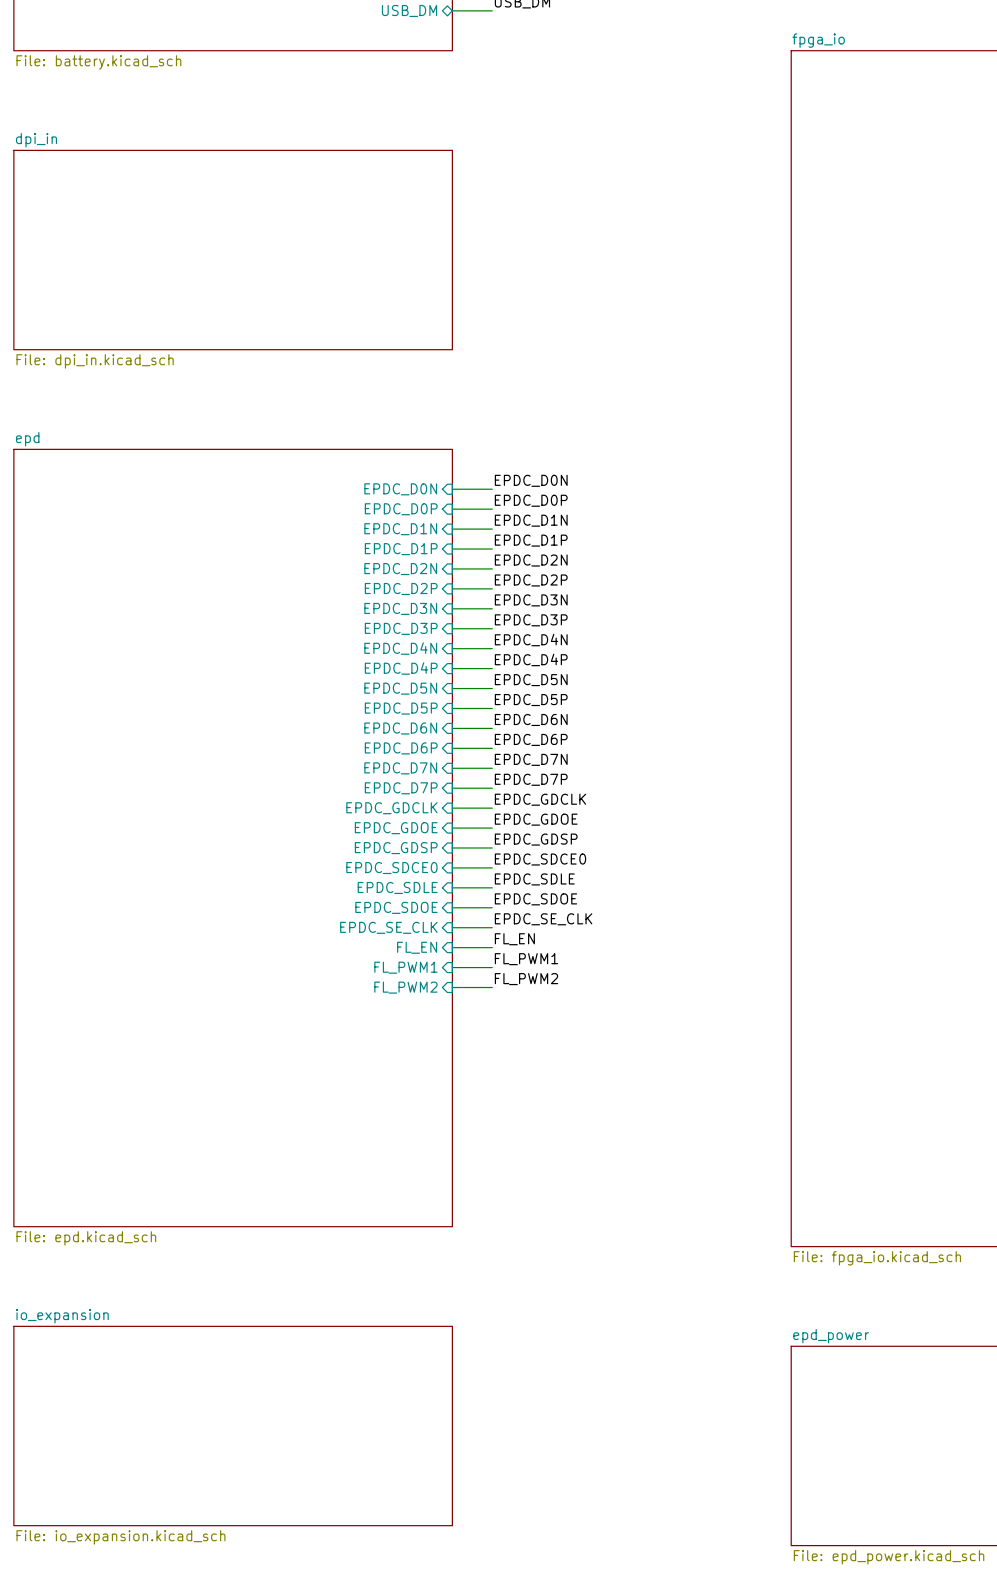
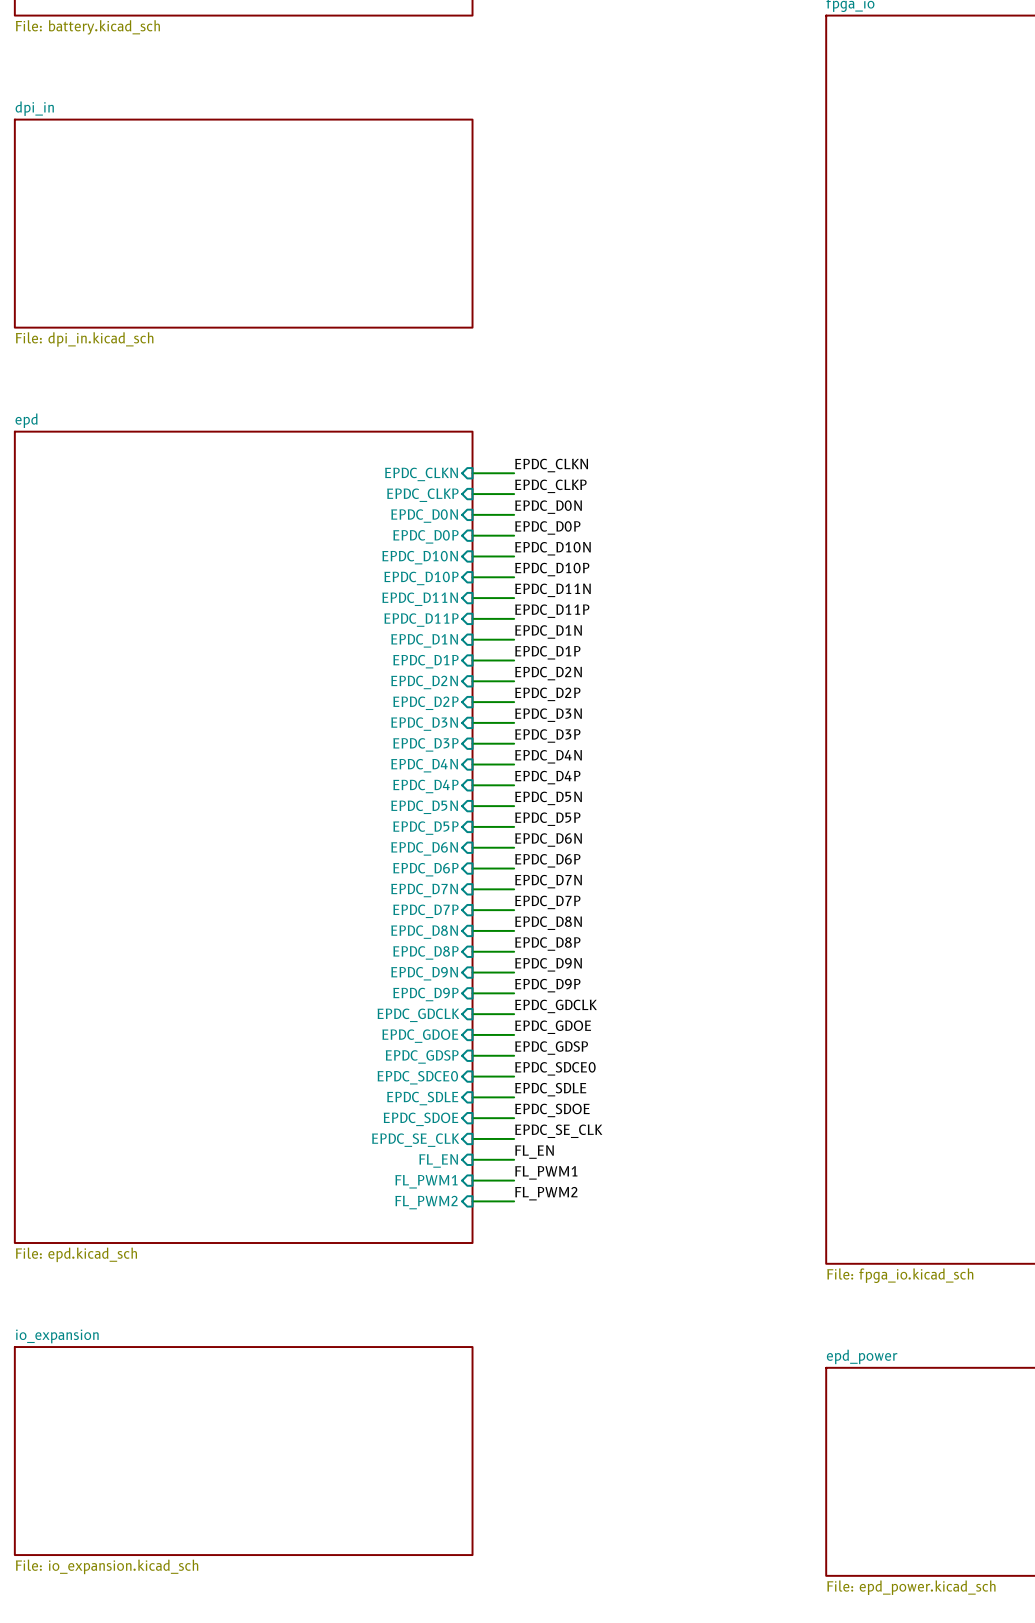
label: EPDC_D0N (531, 480) -> EPDC_CLKN (551, 465)
sheet pin: EPDC_D0N (400, 489) -> EPDC_CLKN (421, 474)
label: EPDC_D0P (531, 500) -> EPDC_CLKP (550, 486)
sheet pin: EPDC_D0P (401, 509) -> EPDC_CLKP (422, 495)
label: EPDC_D1N (531, 520) -> EPDC_D0N (548, 507)
sheet pin: EPDC_D1N (400, 529) -> EPDC_D0N (424, 516)
label: EPDC_D1P (531, 540) -> EPDC_D0P (547, 527)
sheet pin: EPDC_D1P (401, 549) -> EPDC_D0P (425, 536)
label: EPDC_D2N (531, 560) -> EPDC_D10N (552, 548)
sheet pin: EPDC_D2N (400, 569) -> EPDC_D10N (420, 557)
label: EPDC_D2P (531, 580) -> EPDC_D10P (552, 569)
sheet pin: EPDC_D2P (401, 588) -> EPDC_D10P (421, 578)
label: EPDC_D3N (531, 600) -> EPDC_D11N (552, 590)
sheet pin: EPDC_D3N (400, 608) -> EPDC_D11N (420, 599)
label: EPDC_D3P (531, 620) -> EPDC_D11P (552, 611)
sheet pin: EPDC_D3P (401, 628) -> EPDC_D11P (421, 620)
label: EPDC_D4N (531, 640) -> EPDC_D1N (548, 631)
sheet pin: EPDC_D4N (400, 648) -> EPDC_D1N (424, 640)
label: EPDC_D4P (531, 659) -> EPDC_D1P (547, 652)
sheet pin: EPDC_D4P (401, 668) -> EPDC_D1P (425, 661)
label: EPDC_D5N (531, 680) -> EPDC_D2N (548, 673)
sheet pin: EPDC_D5N (400, 688) -> EPDC_D2N (424, 682)
label: EPDC_D5P (531, 700) -> EPDC_D2P (547, 694)
sheet pin: EPDC_D5P (401, 708) -> EPDC_D2P (425, 703)
label: EPDC_D6N (531, 719) -> EPDC_D3N (548, 715)
sheet pin: EPDC_D6N (400, 728) -> EPDC_D3N (424, 724)
label: EPDC_D6P (531, 739) -> EPDC_D3P (547, 735)
sheet pin: EPDC_D6P (401, 748) -> EPDC_D3P (425, 744)
label: EPDC_D7N (531, 759) -> EPDC_D4N (548, 756)
sheet pin: EPDC_D7N (400, 768) -> EPDC_D4N (424, 765)
label: EPDC_D7P (531, 779) -> EPDC_D4P (547, 777)
sheet pin: EPDC_D7P (401, 788) -> EPDC_D4P (425, 786)
label: EPDC_GDCLK (540, 799) -> EPDC_D5N (548, 798)
sheet pin: EPDC_GDCLK (391, 808) -> EPDC_D5N (424, 807)
label: EPDC_GDOE (536, 819) -> EPDC_D5P (547, 819)
sheet pin: EPDC_GDOE (396, 828) -> EPDC_D5P (425, 828)
label: EPDC_GDSP (536, 839) -> EPDC_D6N (548, 840)
sheet pin: EPDC_GDSP (396, 848) -> EPDC_D6N (424, 848)
label: EPDC_SDCE0 (540, 859) -> EPDC_D6P (547, 860)
sheet pin: EPDC_SDCE0 (391, 868) -> EPDC_D6P (425, 869)
label: EPDC_SDLE (534, 879) -> EPDC_D7N (548, 881)
sheet pin: EPDC_SDLE (397, 887) -> EPDC_D7N (424, 890)
label: EPDC_SDOE (535, 899) -> EPDC_D7P (547, 902)
sheet pin: EPDC_SDOE (396, 907) -> EPDC_D7P (425, 911)
label: EPDC_SE_CLK (543, 919) -> EPDC_D8N (548, 923)
sheet pin: EPDC_SE_CLK (388, 927) -> EPDC_D8N (424, 932)
label: FL_EN (514, 939) -> EPDC_D8P (547, 944)
sheet pin: FL_EN (417, 947) -> EPDC_D8P (425, 952)
label: FL_PWM1 (526, 959) -> EPDC_D9N (548, 964)
sheet pin: FL_PWM1 (405, 967) -> EPDC_D9N (424, 973)
label: FL_PWM2 (526, 979) -> EPDC_D9P (547, 985)
sheet pin: FL_PWM2 (405, 987) -> EPDC_D9P (425, 994)
label: none -> EPDC_GDCLK (556, 1006)
sheet pin: none -> EPDC_GDCLK (418, 1015)
wire: none -> (472, 1014) (514, 1014)
label: none -> EPDC_GDOE (553, 1027)
sheet pin: none -> EPDC_GDOE (420, 1036)
wire: none -> (472, 1034) (514, 1034)
label: none -> EPDC_GDSP (551, 1048)
sheet pin: none -> EPDC_GDSP (422, 1056)
wire: none -> (472, 1055) (514, 1055)
label: none -> EPDC_SDCE0 (555, 1068)
sheet pin: none -> EPDC_SDCE0 (417, 1077)
wire: none -> (472, 1076) (514, 1076)
label: none -> EPDC_SDLE (550, 1089)
sheet pin: none -> EPDC_SDLE (422, 1098)
wire: none -> (472, 1097) (514, 1097)
label: none -> EPDC_SDOE (552, 1110)
sheet pin: none -> EPDC_SDOE (421, 1119)
wire: none -> (472, 1118) (514, 1118)
label: none -> EPDC_SE_CLK (558, 1131)
sheet pin: none -> EPDC_SE_CLK (415, 1140)
wire: none -> (472, 1138) (514, 1138)
label: none -> FL_EN (534, 1152)
wire: none -> (472, 1159) (514, 1159)
sheet pin: none -> FL_EN (438, 1160)
label: none -> FL_PWM1 (546, 1172)
wire: none -> (472, 1180) (514, 1180)
sheet pin: none -> FL_PWM1 (426, 1181)
label: none -> FL_PWM2 (546, 1193)
sheet pin: none -> FL_PWM2 (426, 1202)
wire: none -> (472, 1201) (514, 1201)

